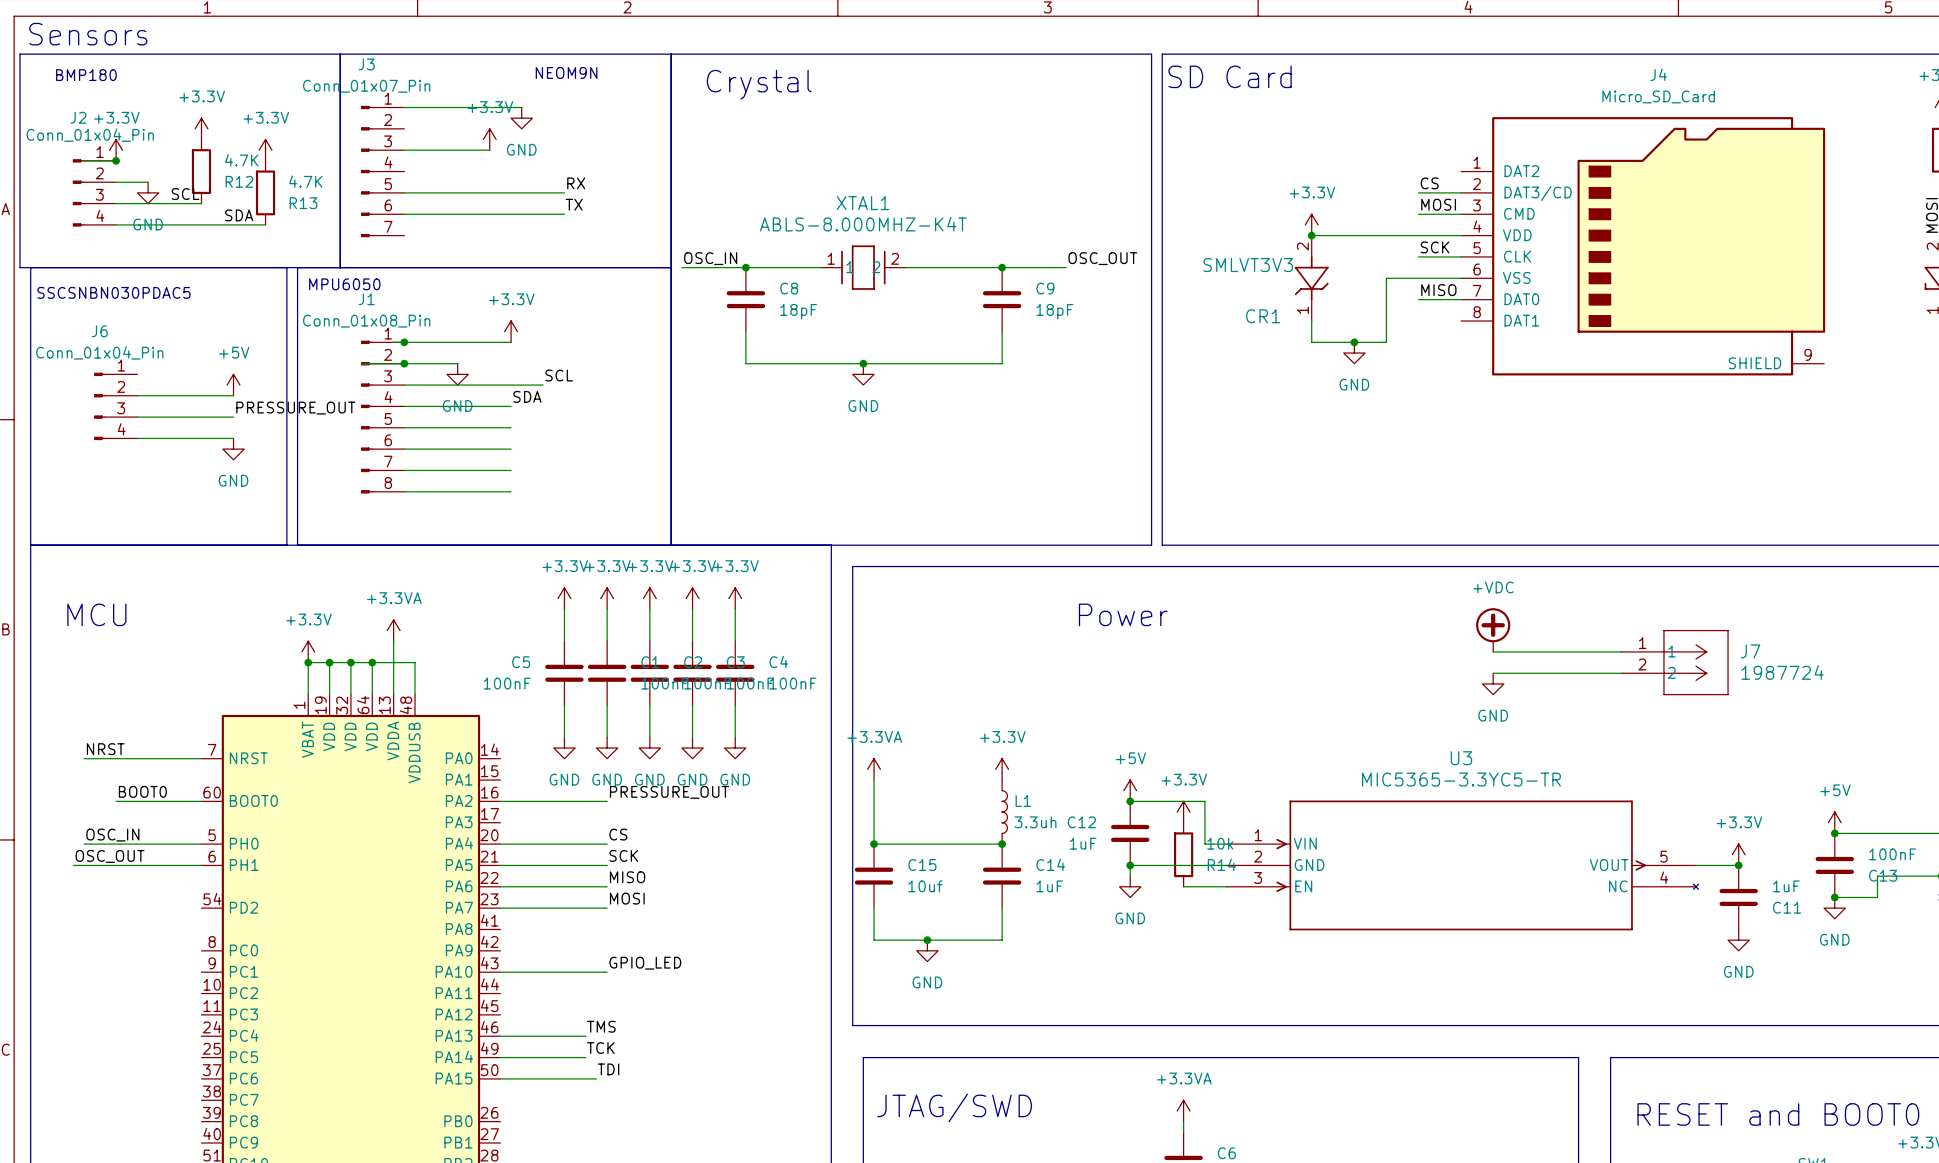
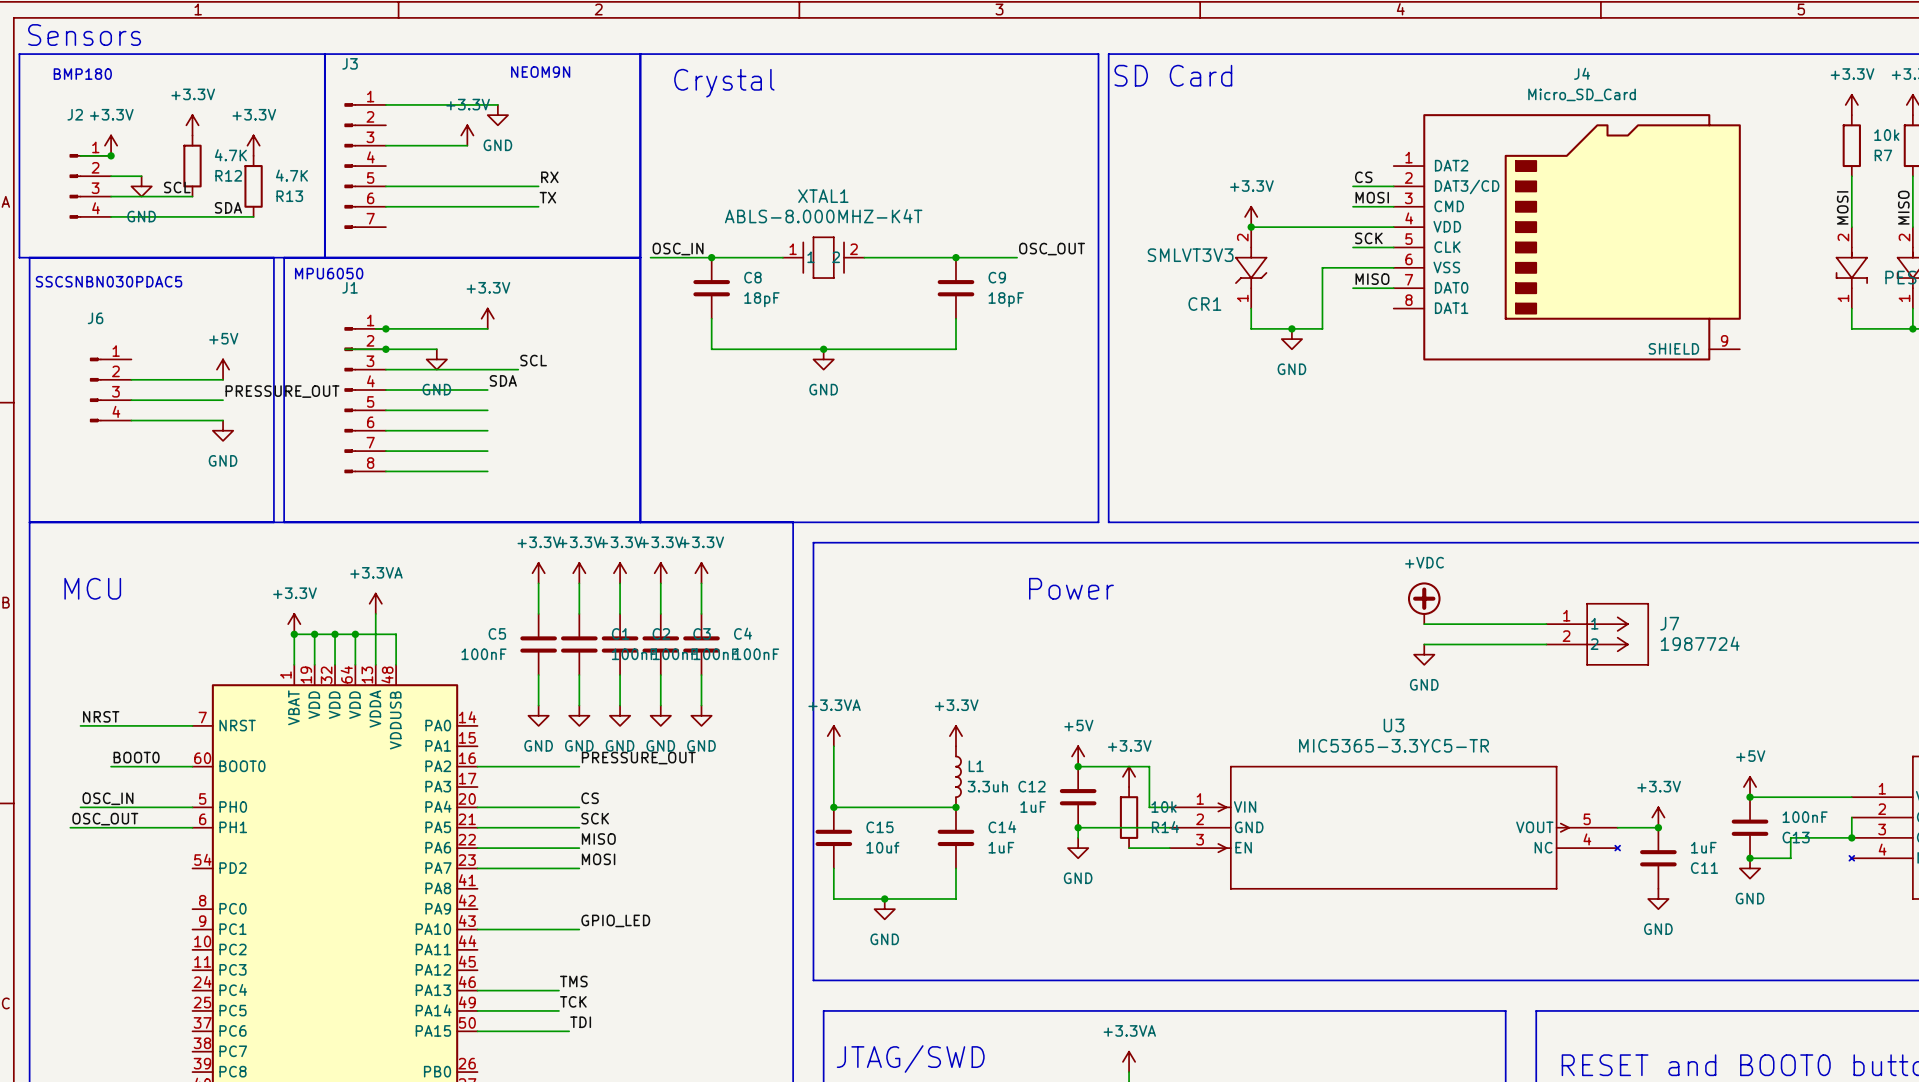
J3 value: Conn_01x07_Pin (366, 86) -> none
J2 value: Conn_01x04_Pin (90, 135) -> none
J1 value: Conn_01x08_Pin (366, 321) -> none
J6 value: Conn_01x04_Pin (99, 352) -> none

